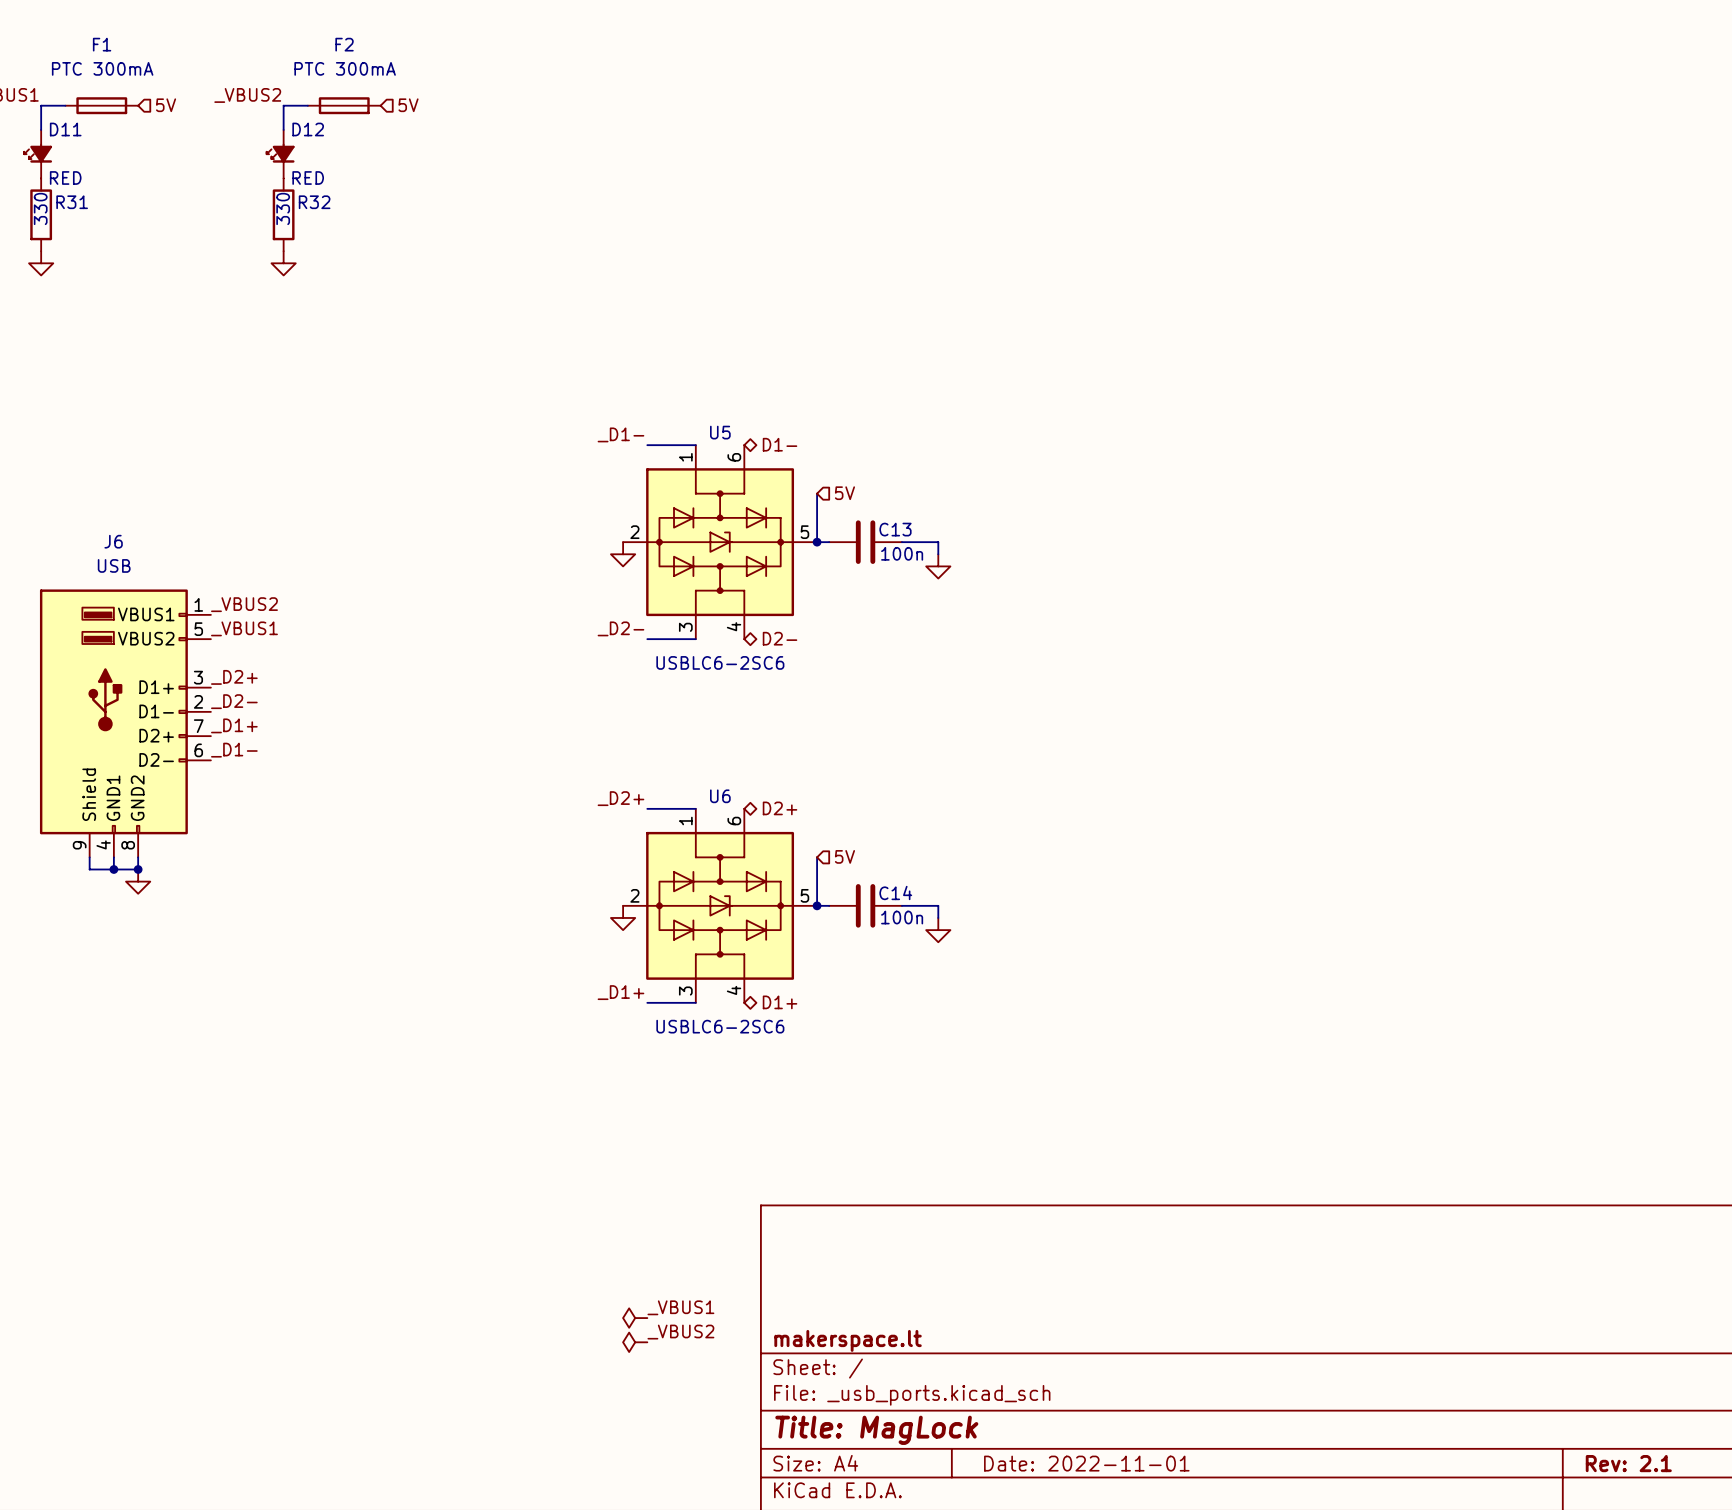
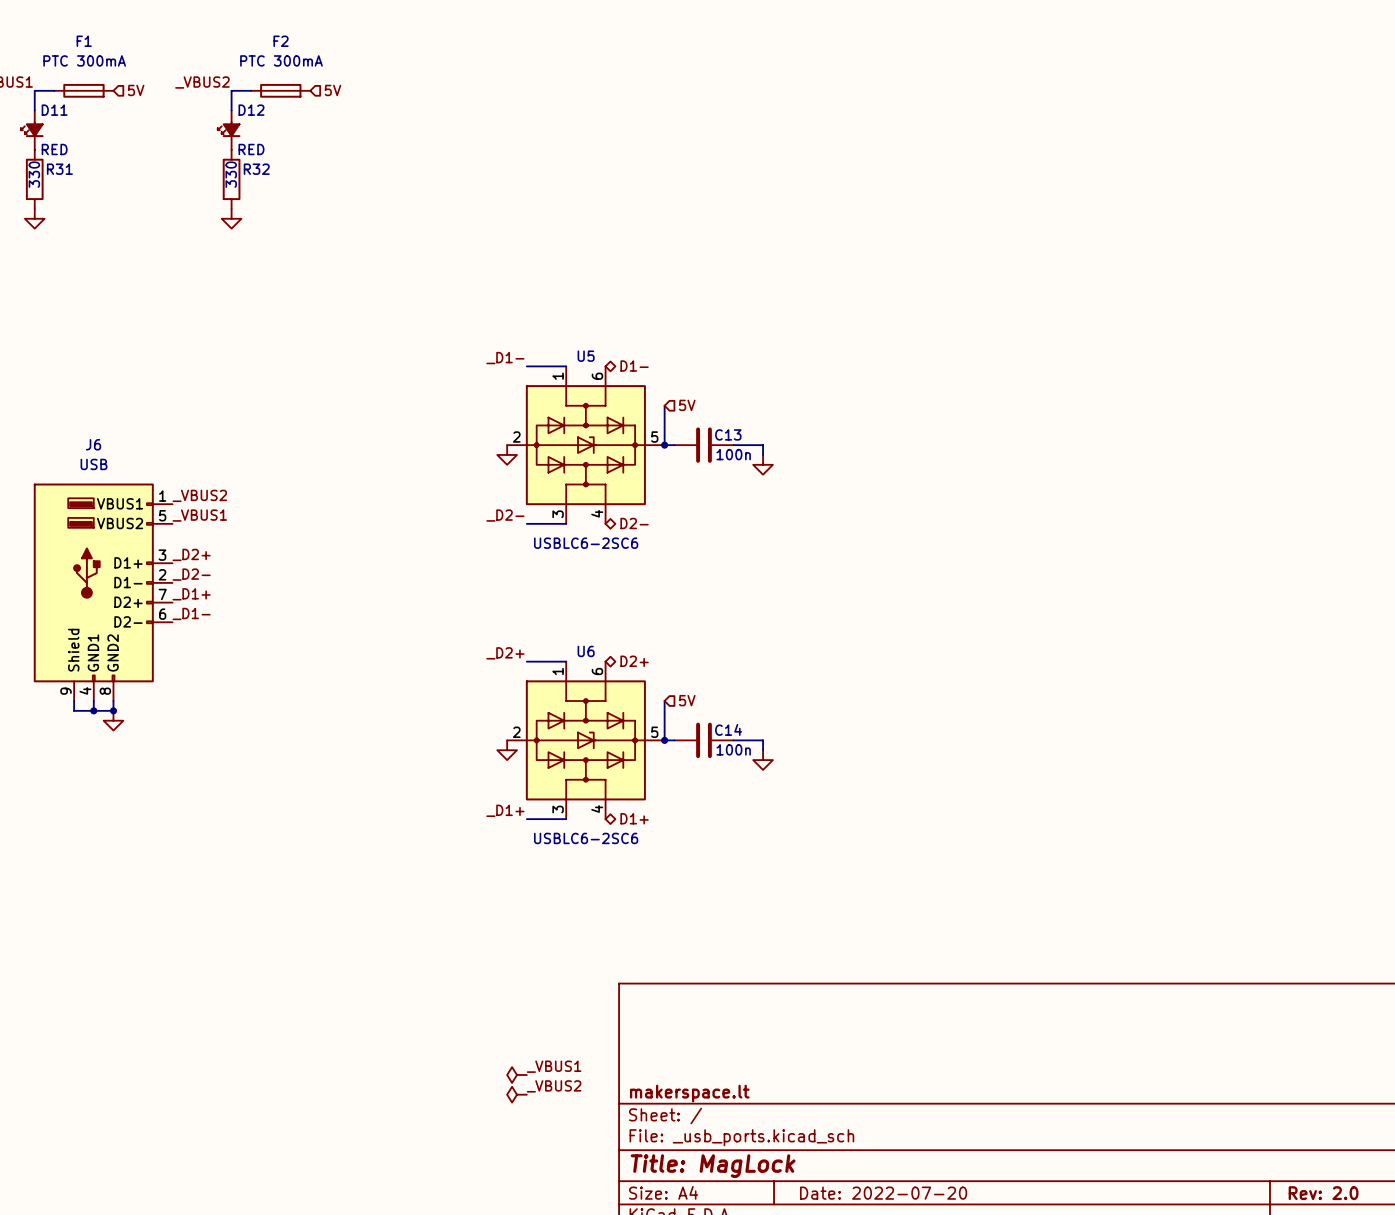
title block: Date: 2022-11-01 (1086, 1463) -> Date: 2022-07-20 (883, 1193)
title block: Rev: 2.1 (1628, 1463) -> Rev: 2.0 (1323, 1193)

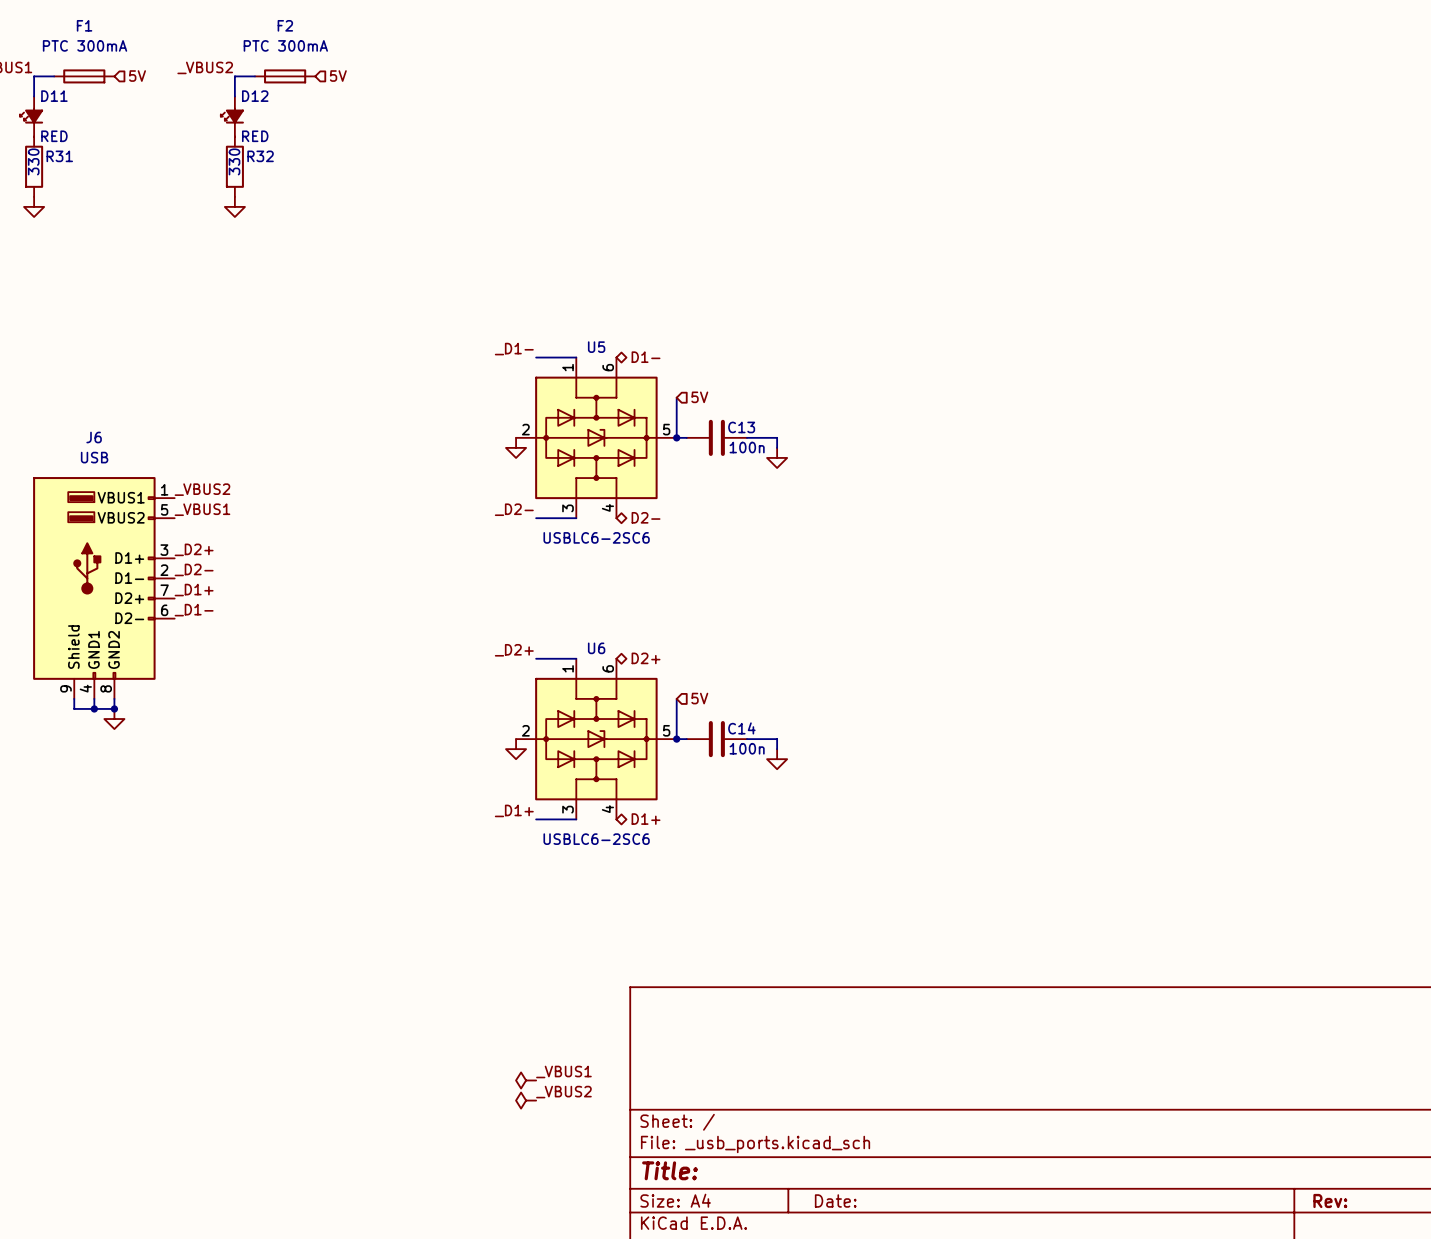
title block: makerspace.lt (689, 1093) -> none
title block: Title: MagLock (713, 1166) -> Title: (669, 1170)
title block: Date: 2022-07-20 (883, 1193) -> Date: (835, 1201)
title block: Rev: 2.0 (1323, 1193) -> Rev: (1330, 1201)

